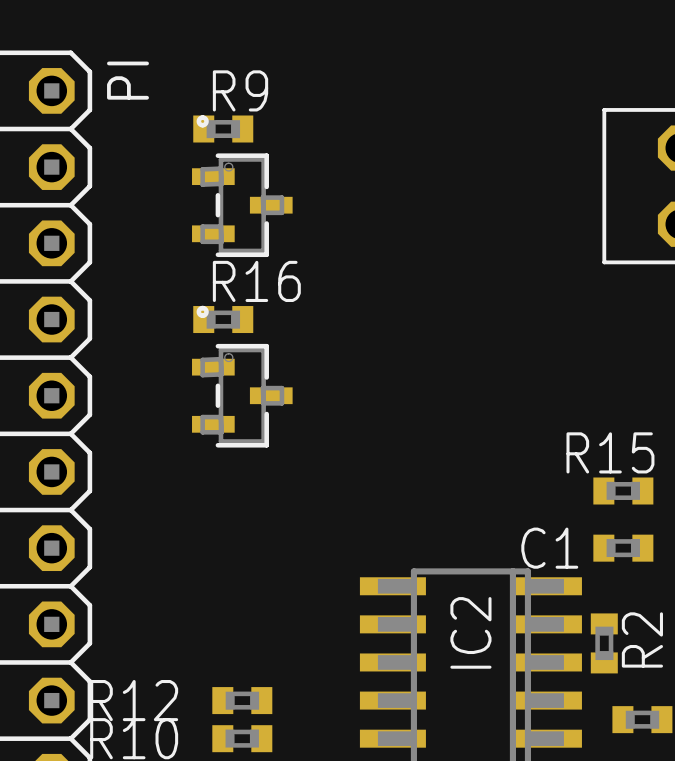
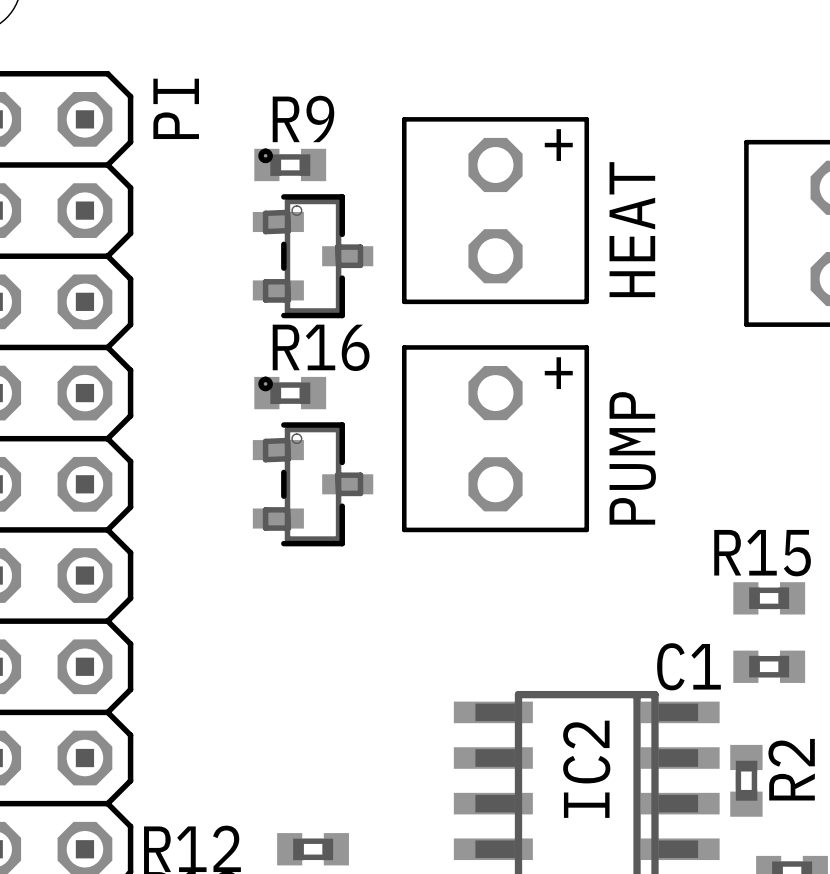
HEAT: none -> (495, 210)
PUMP: none -> (495, 438)

